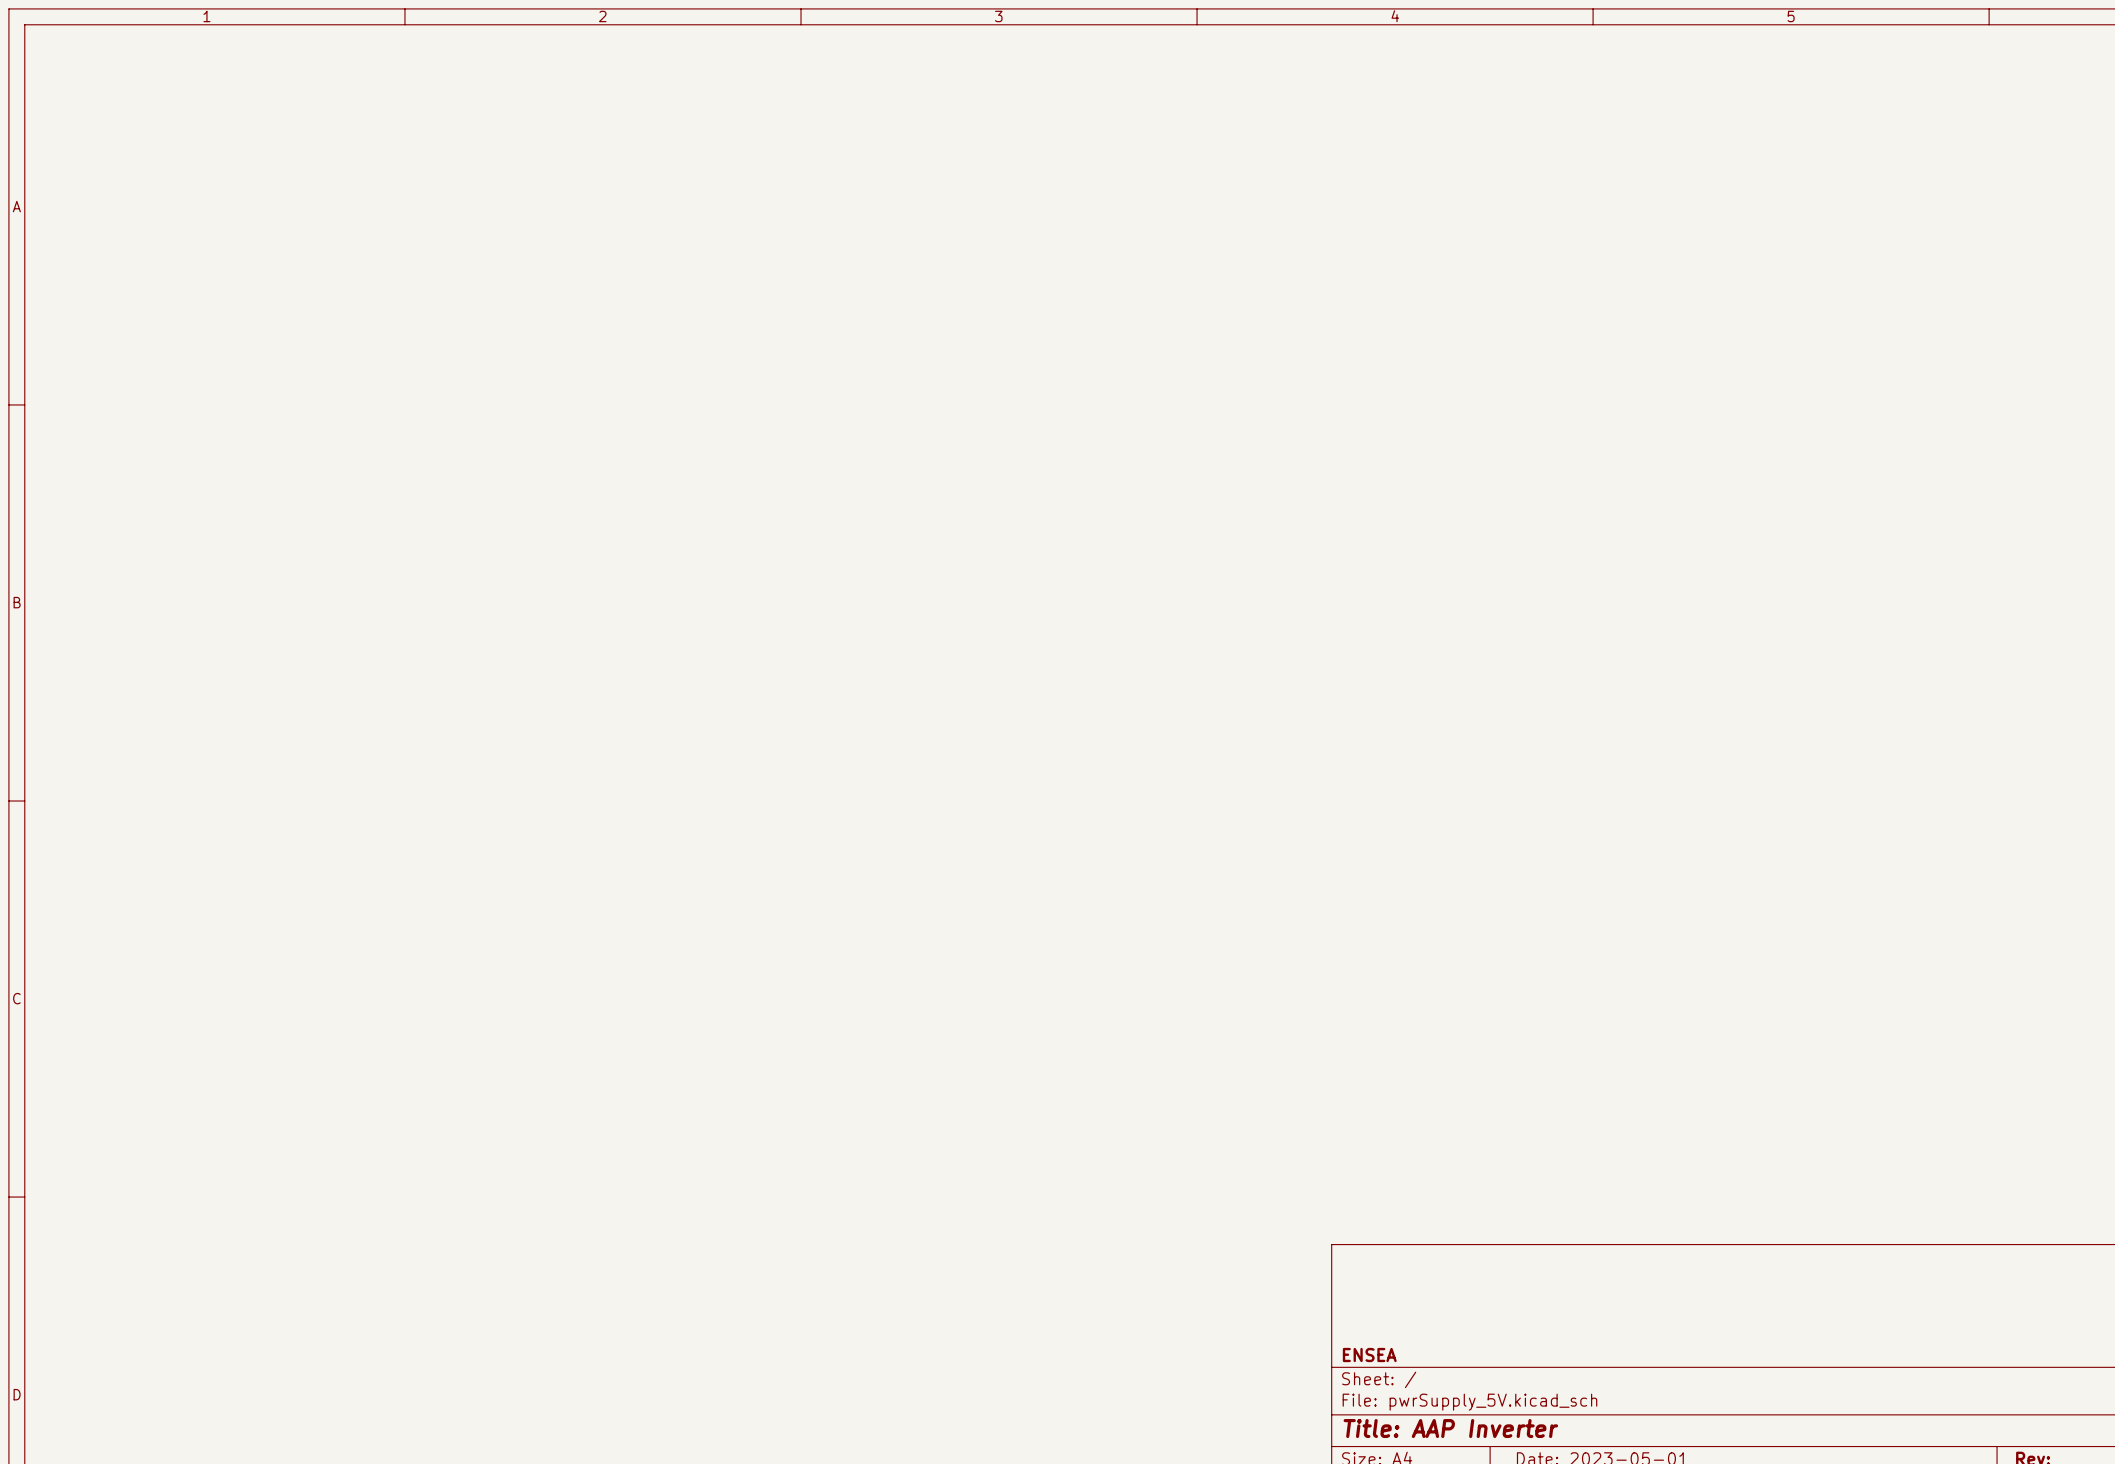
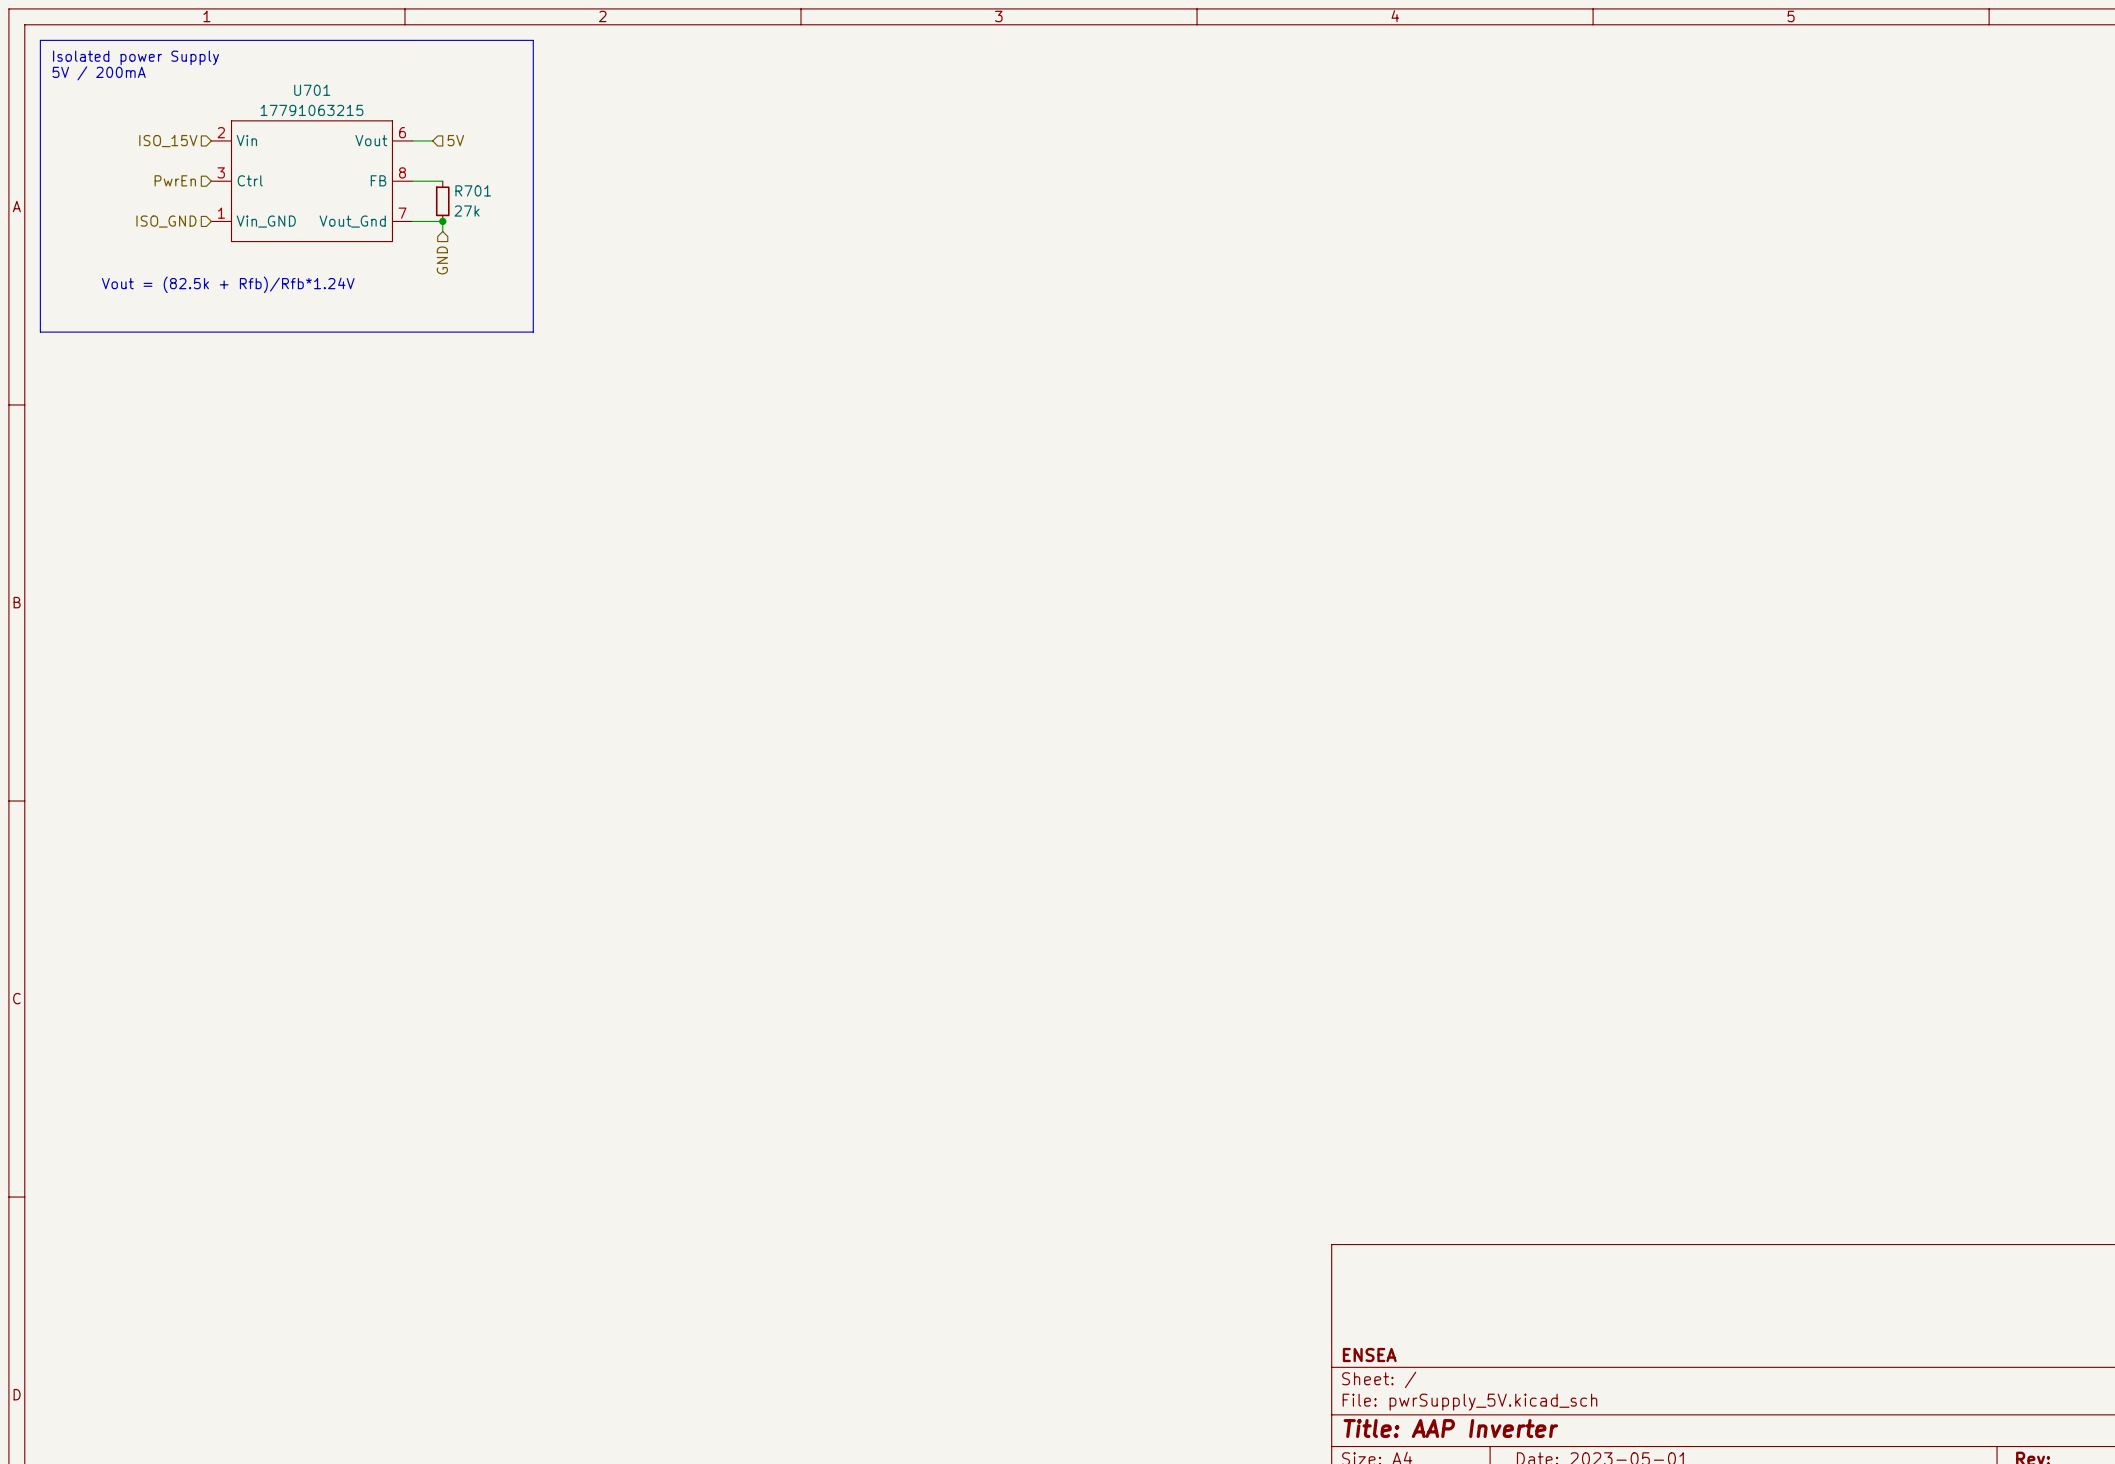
line: none -> (40, 40) (533, 40) (533, 332) (40, 332) (40, 40)
text: none -> Isolated power Supply (136, 57)
text: none -> 5V / 200mA (99, 73)
wire: none -> (412, 140) (432, 140)
hierarchical label: none -> 5V (455, 140)
hierarchical label: none -> ISO_15V (168, 141)
hierarchical label: none -> PwrEn (175, 180)
U701: none -> 17791063215 (311, 181)
wire: none -> (412, 181) (442, 181)
R701: none -> 27k (442, 201)
hierarchical label: none -> ISO_GND (166, 221)
wire: none -> (412, 221) (442, 221) (442, 231)
junction: none -> (442, 221)
hierarchical label: none -> GND (442, 260)
text: none -> Vout = (82.5k + Rfb)/Rfb*1.24V (228, 284)

